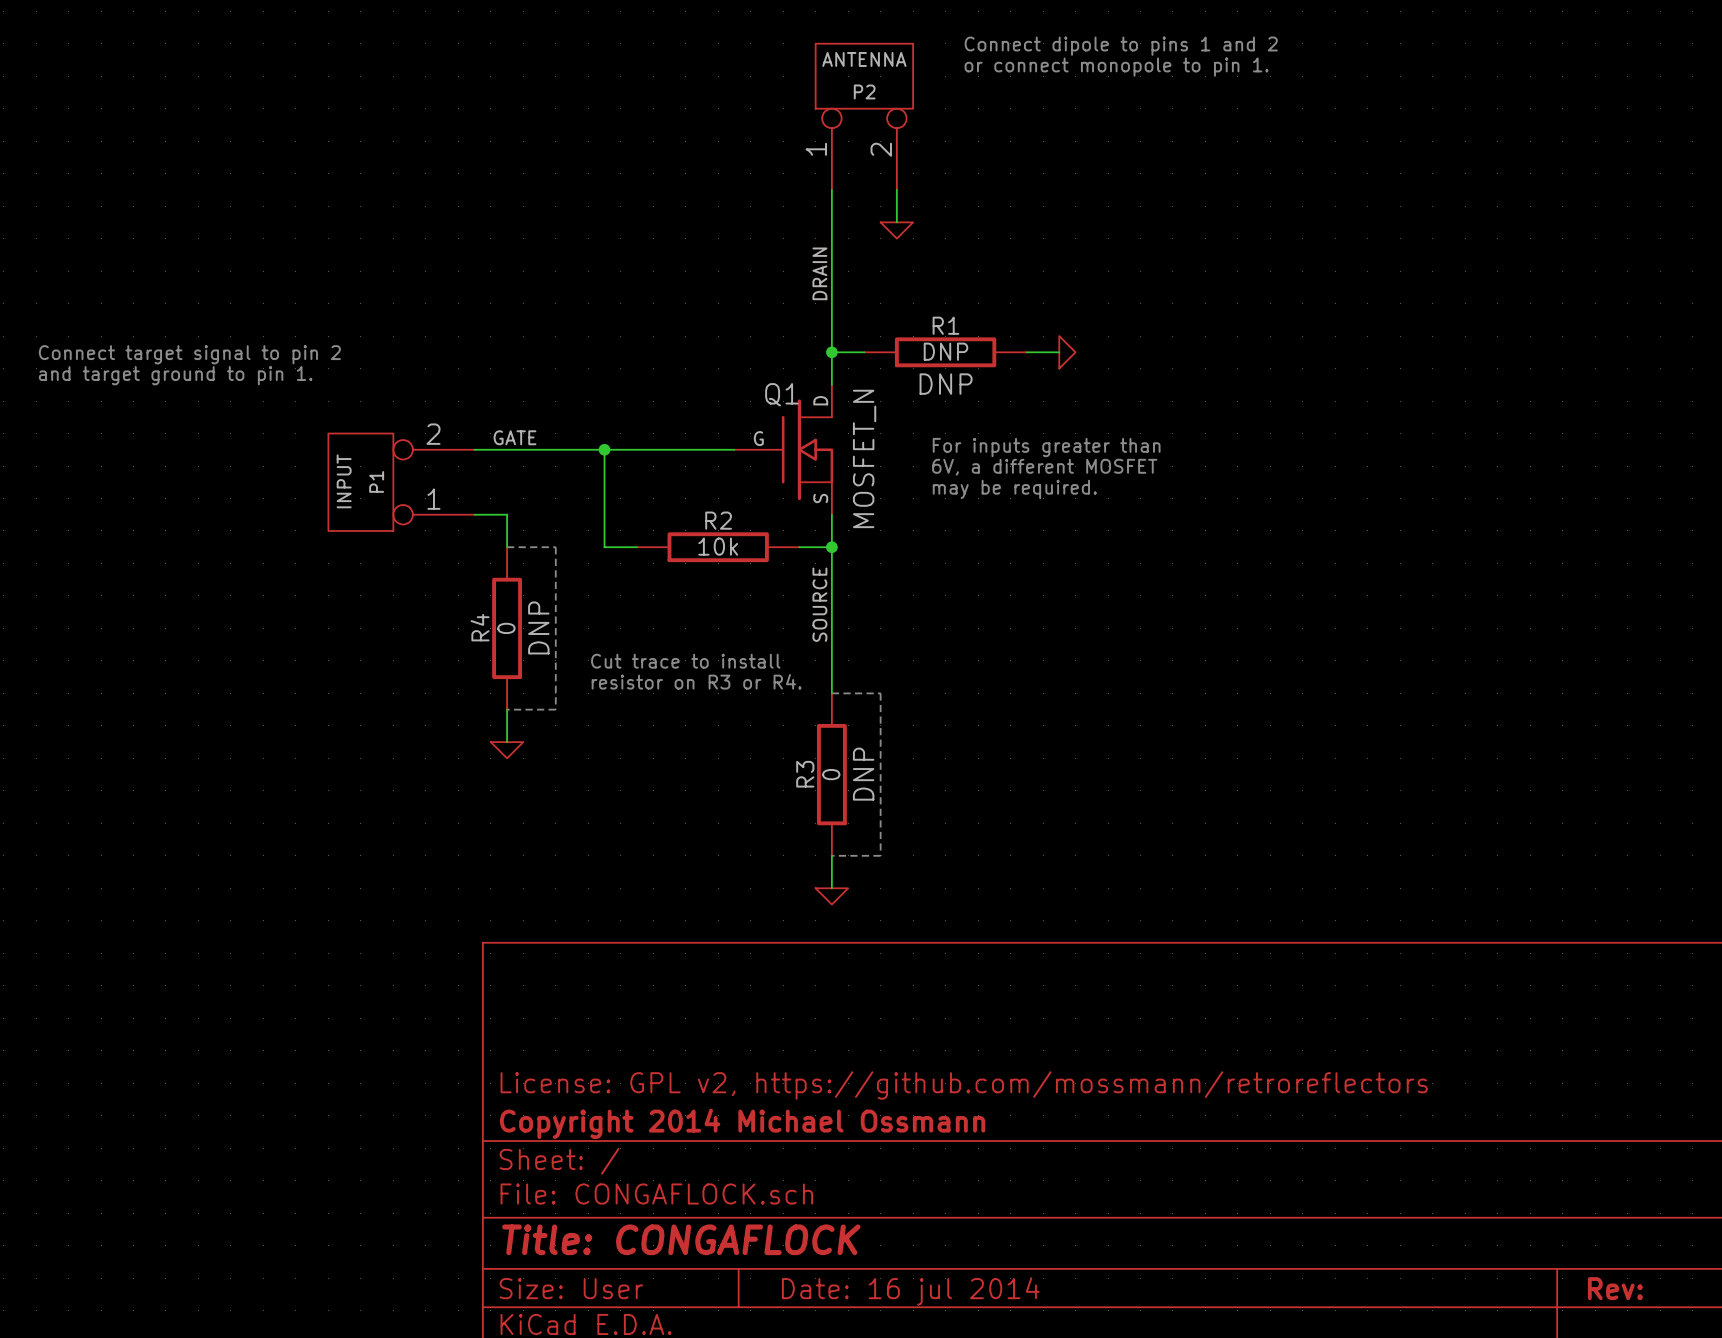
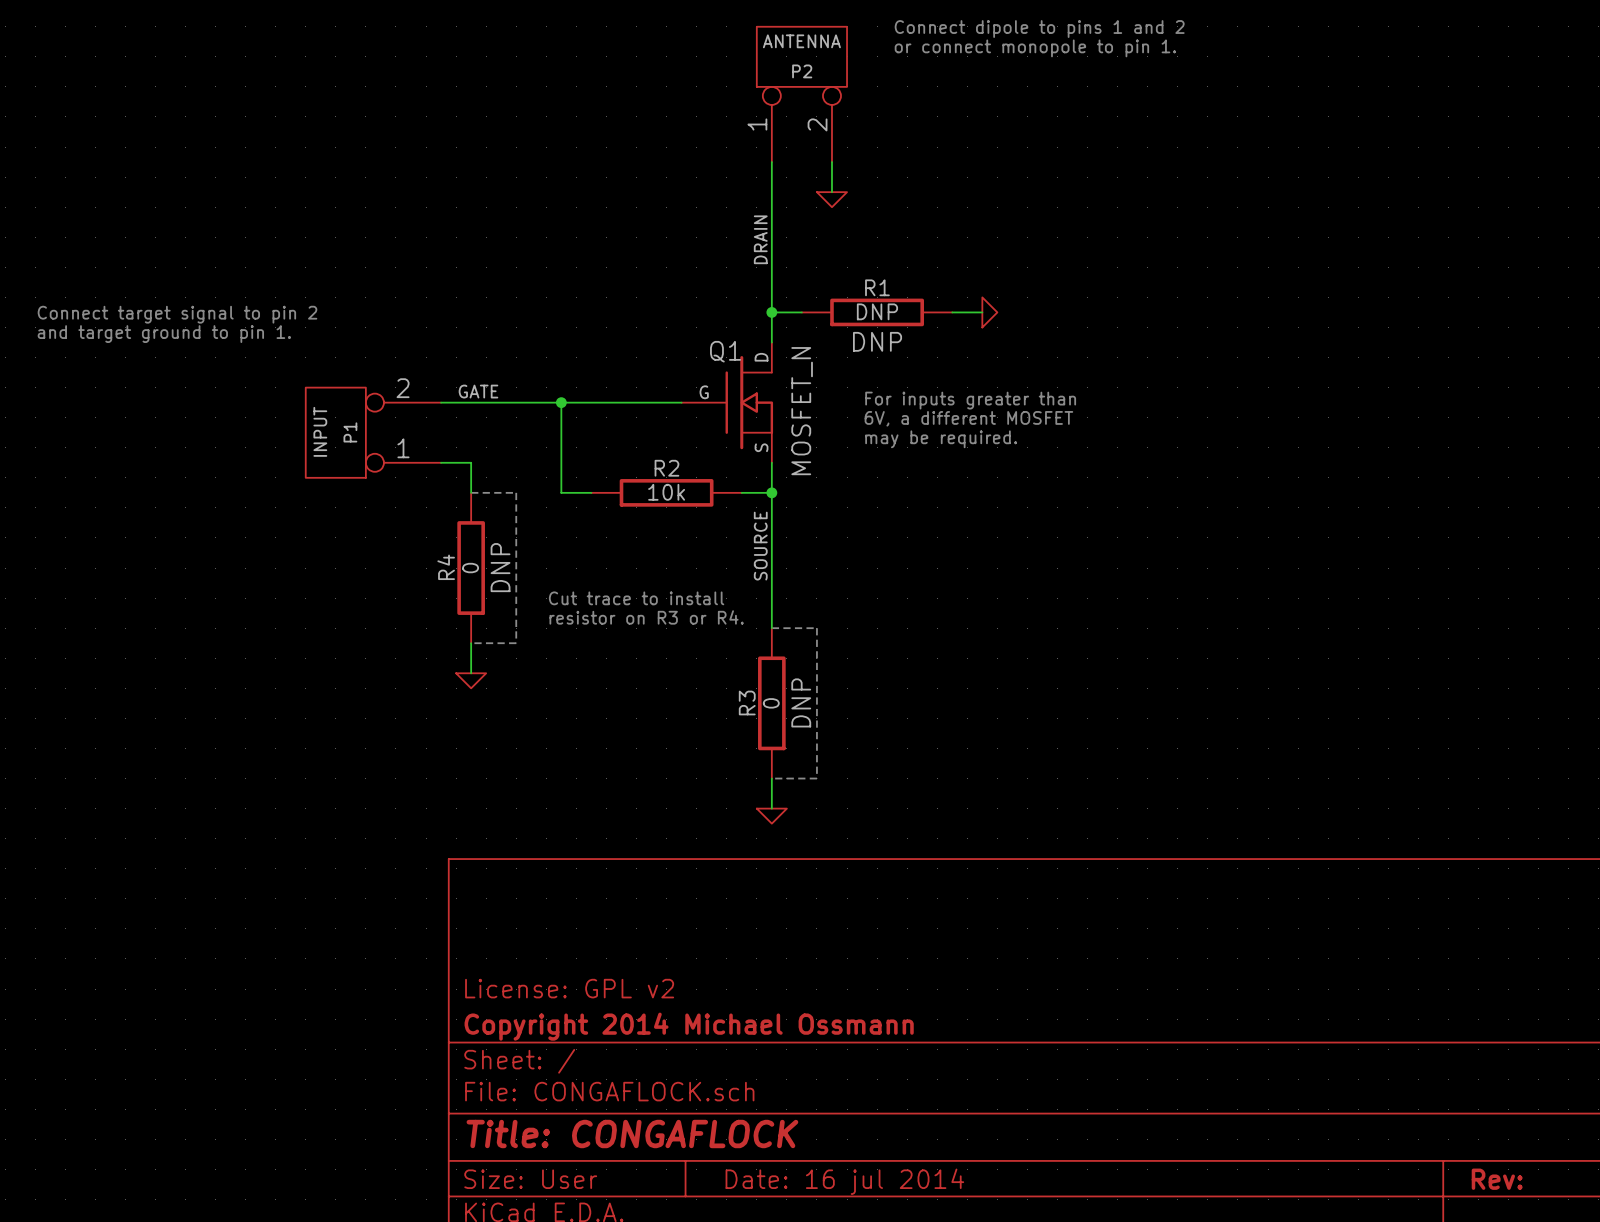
title block: License: GPL v2, https://github.com/mossmann/retroreflectors (964, 1085) -> License: GPL v2 (569, 988)

